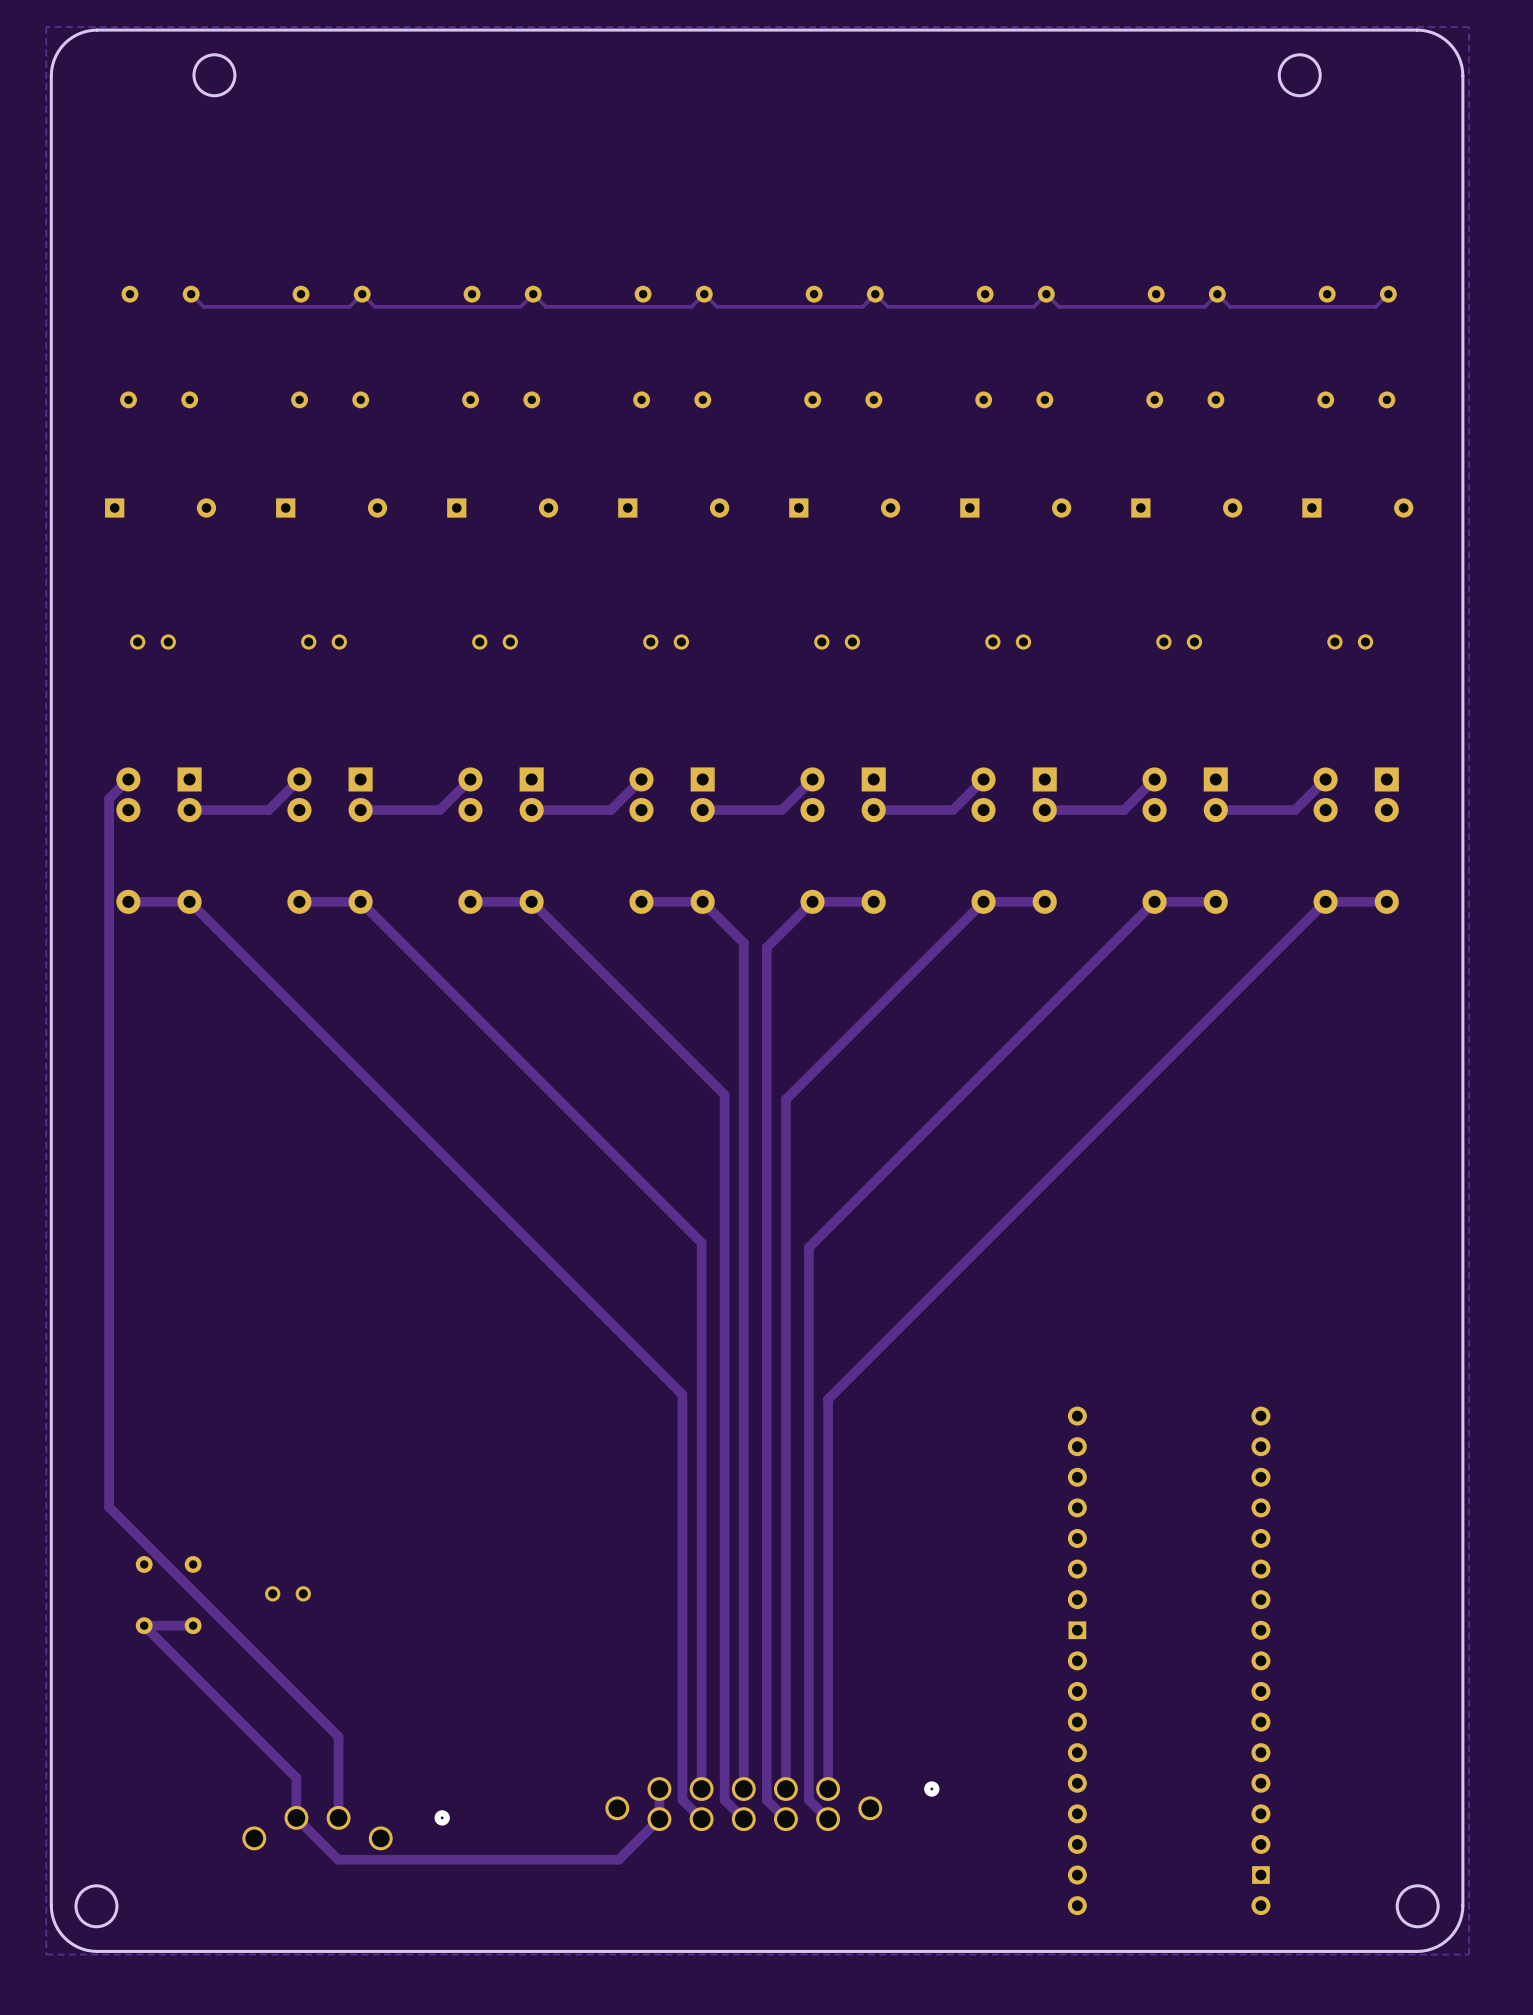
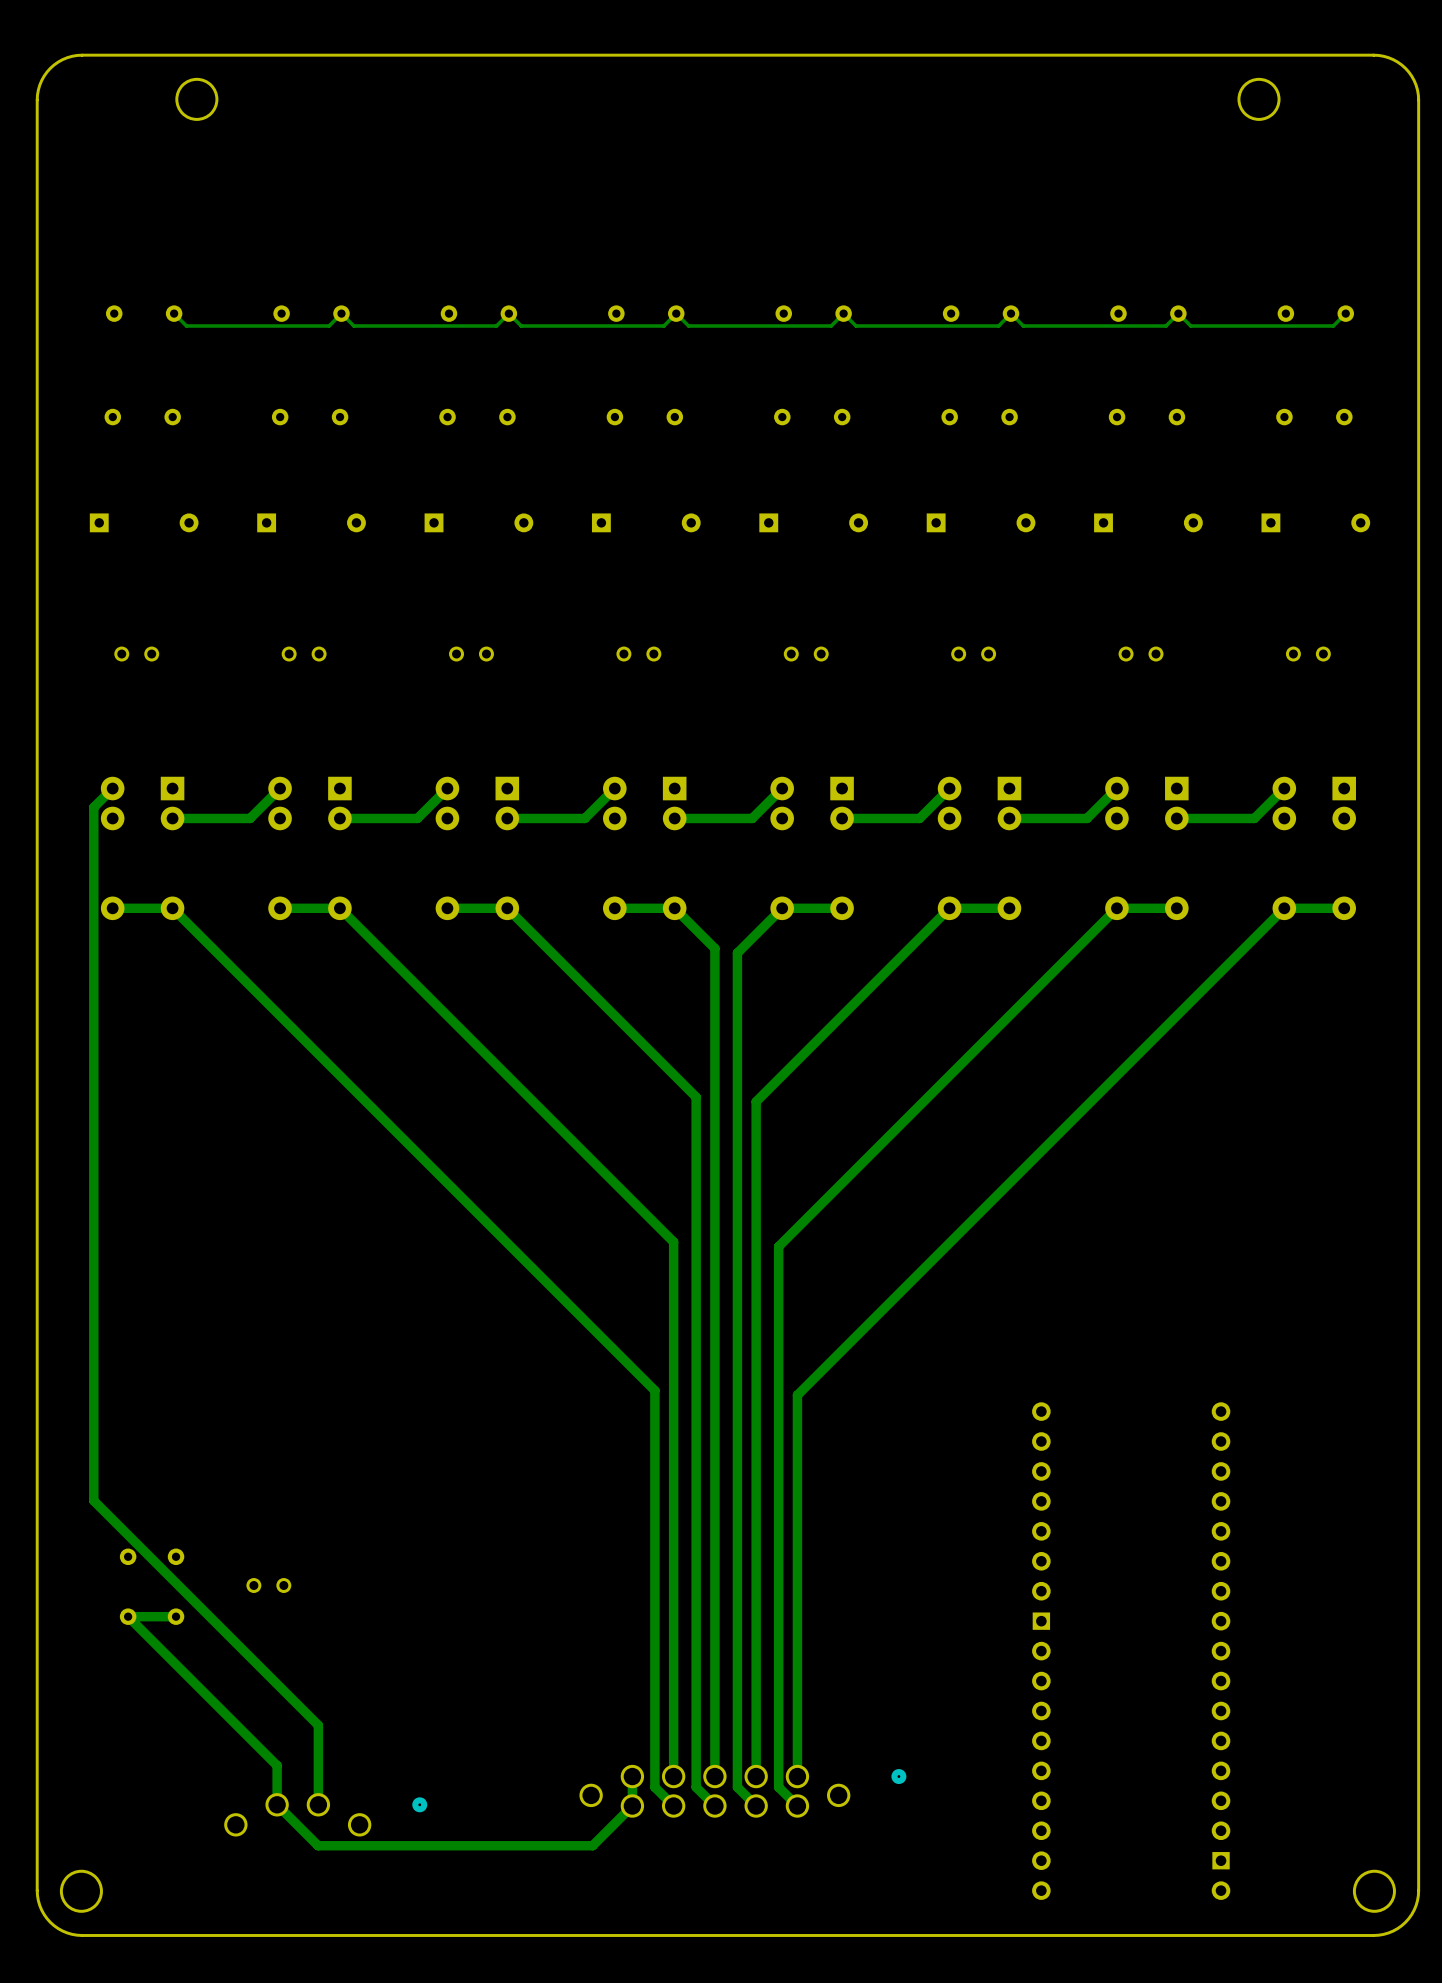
zone outline: (1469, 27) (46, 27) (46, 1954) (1469, 1954) (1469, 27) -> none

